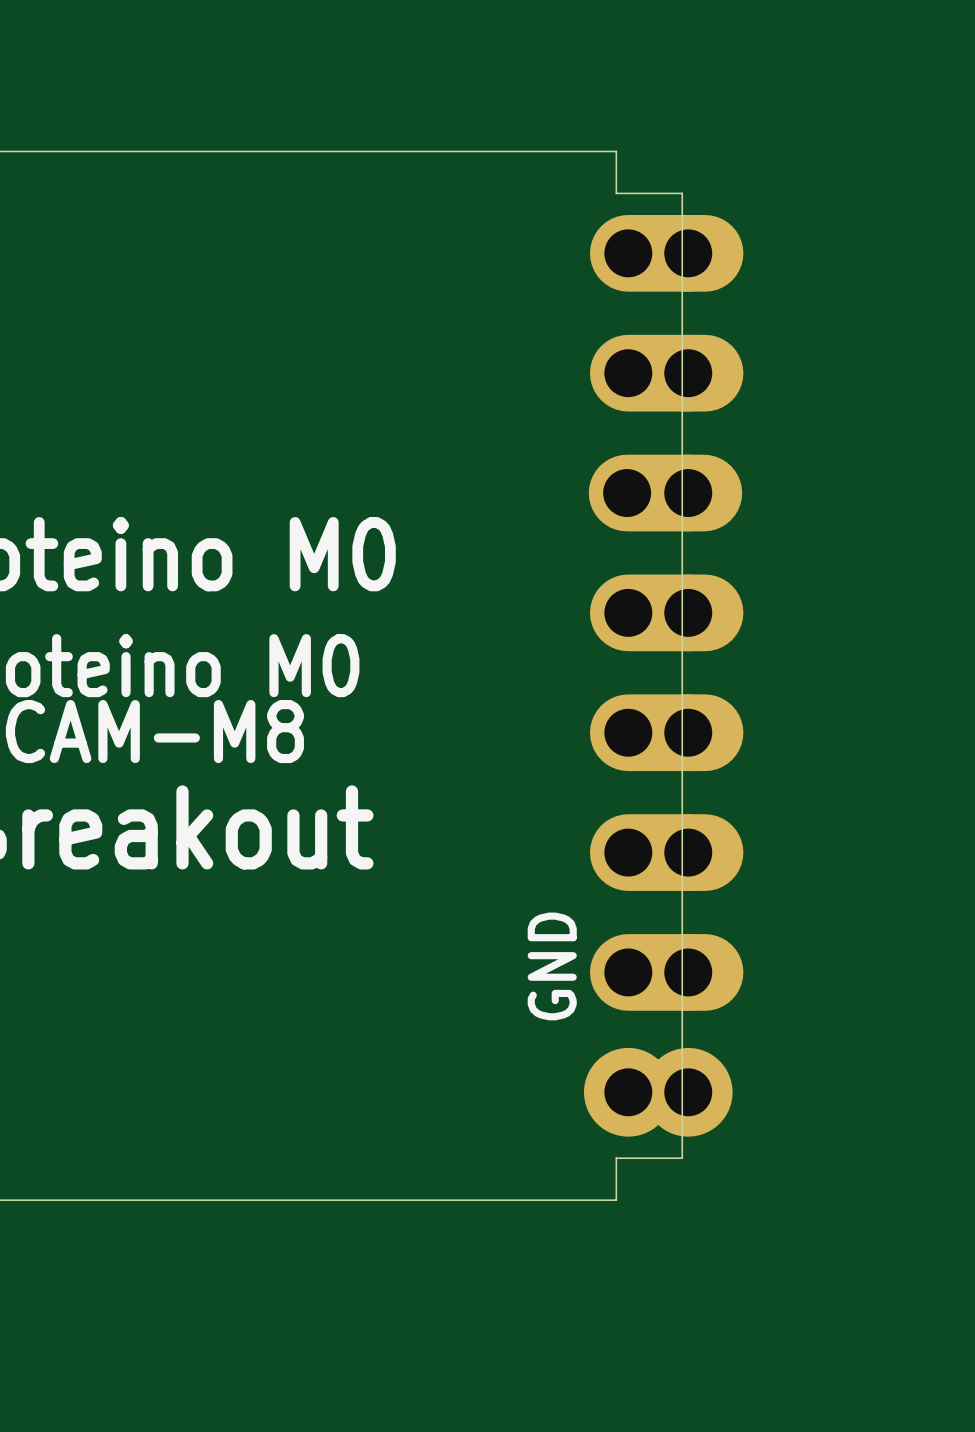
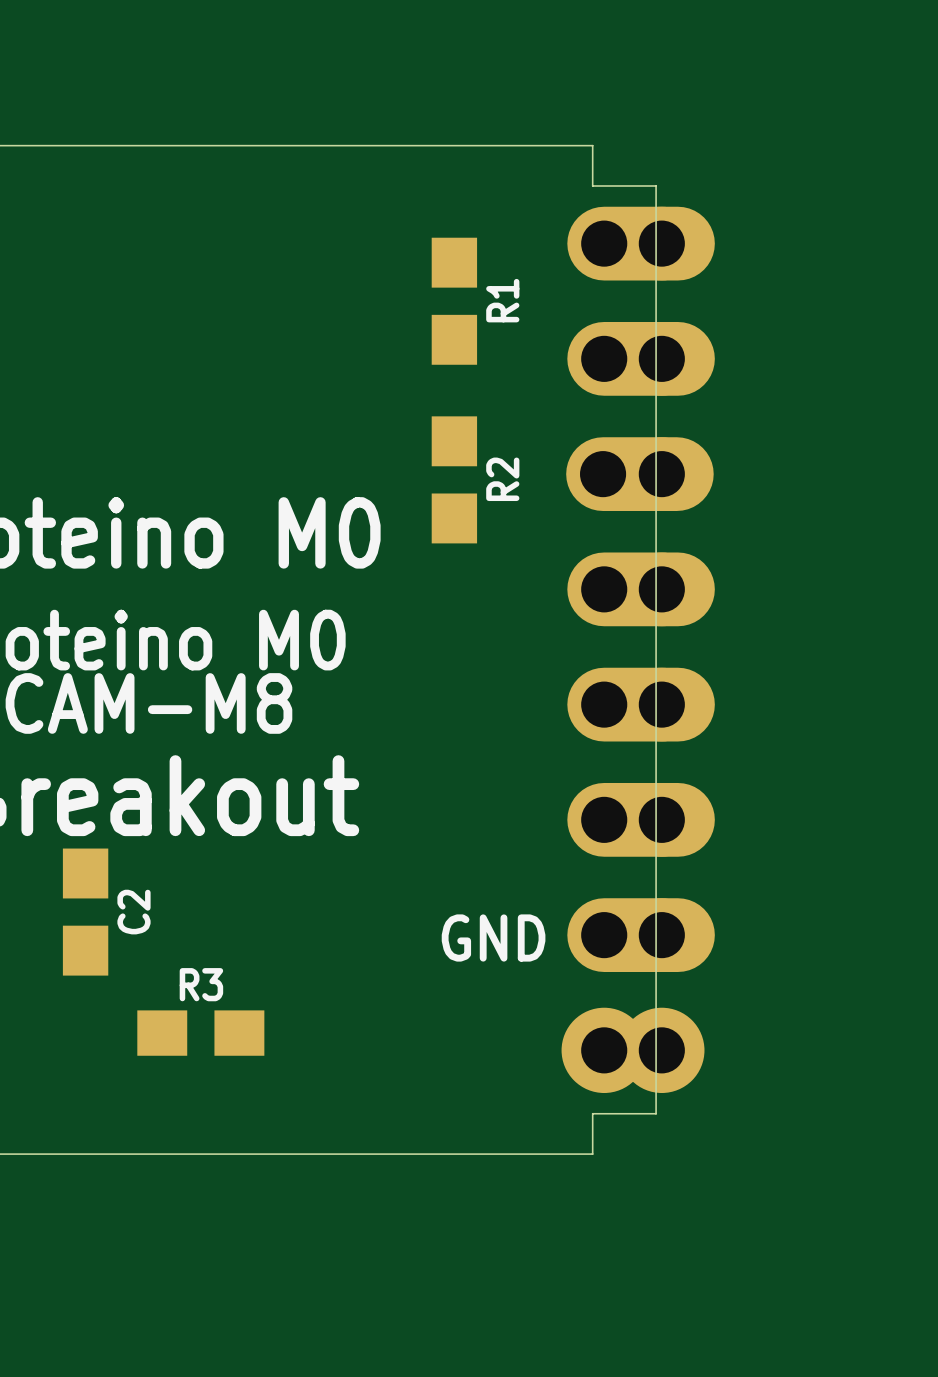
R1: none -> (454, 301)
R2: none -> (454, 479)
C2: none -> (85, 912)
text rotation: 0° (552, 966) -> 90° clockwise (493, 937)
R3: none -> (200, 1033)

